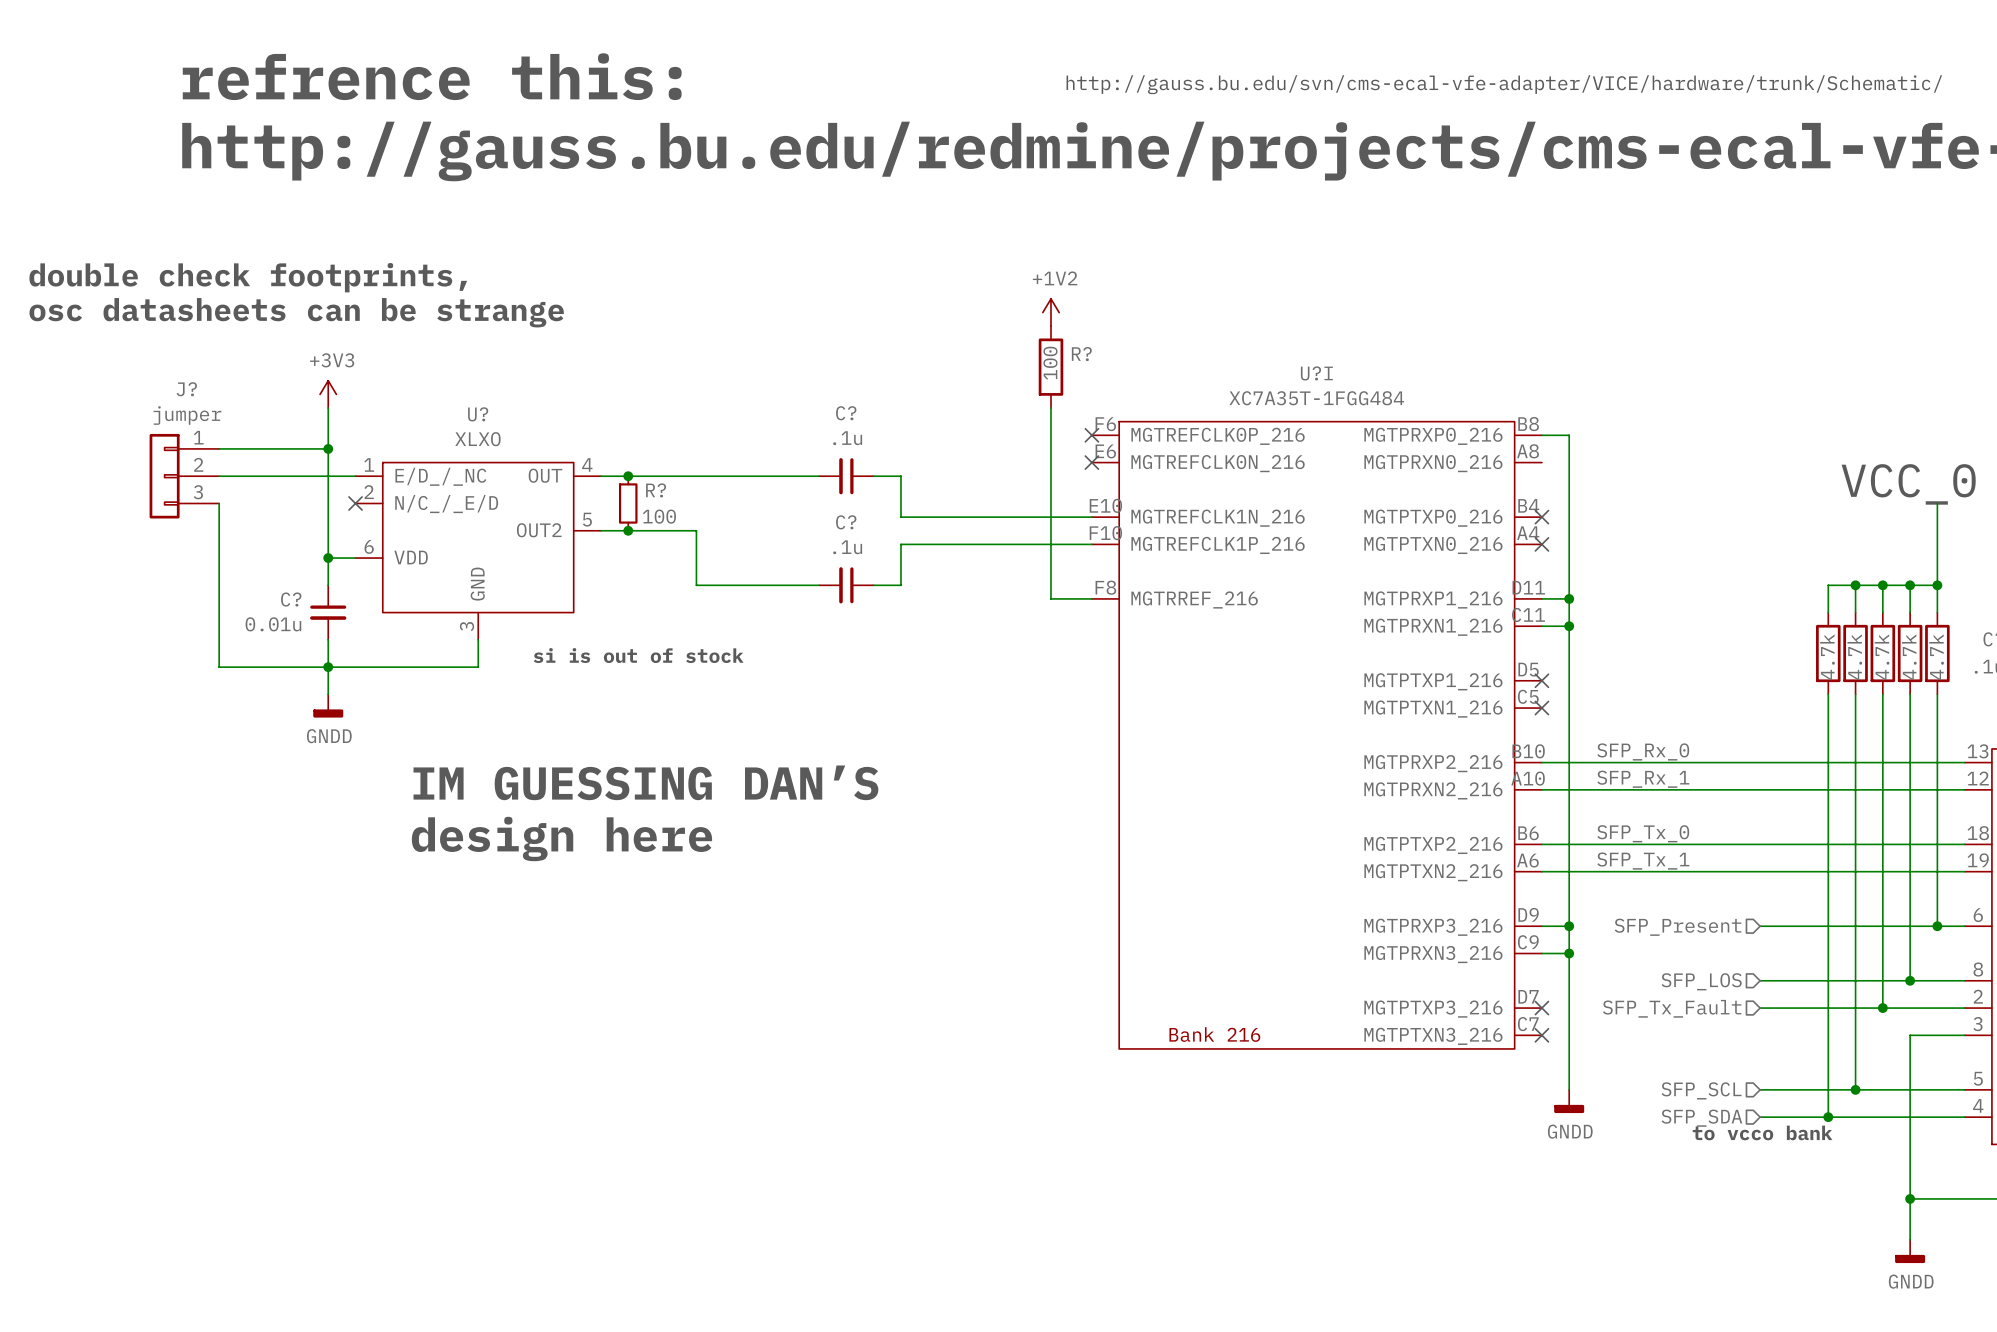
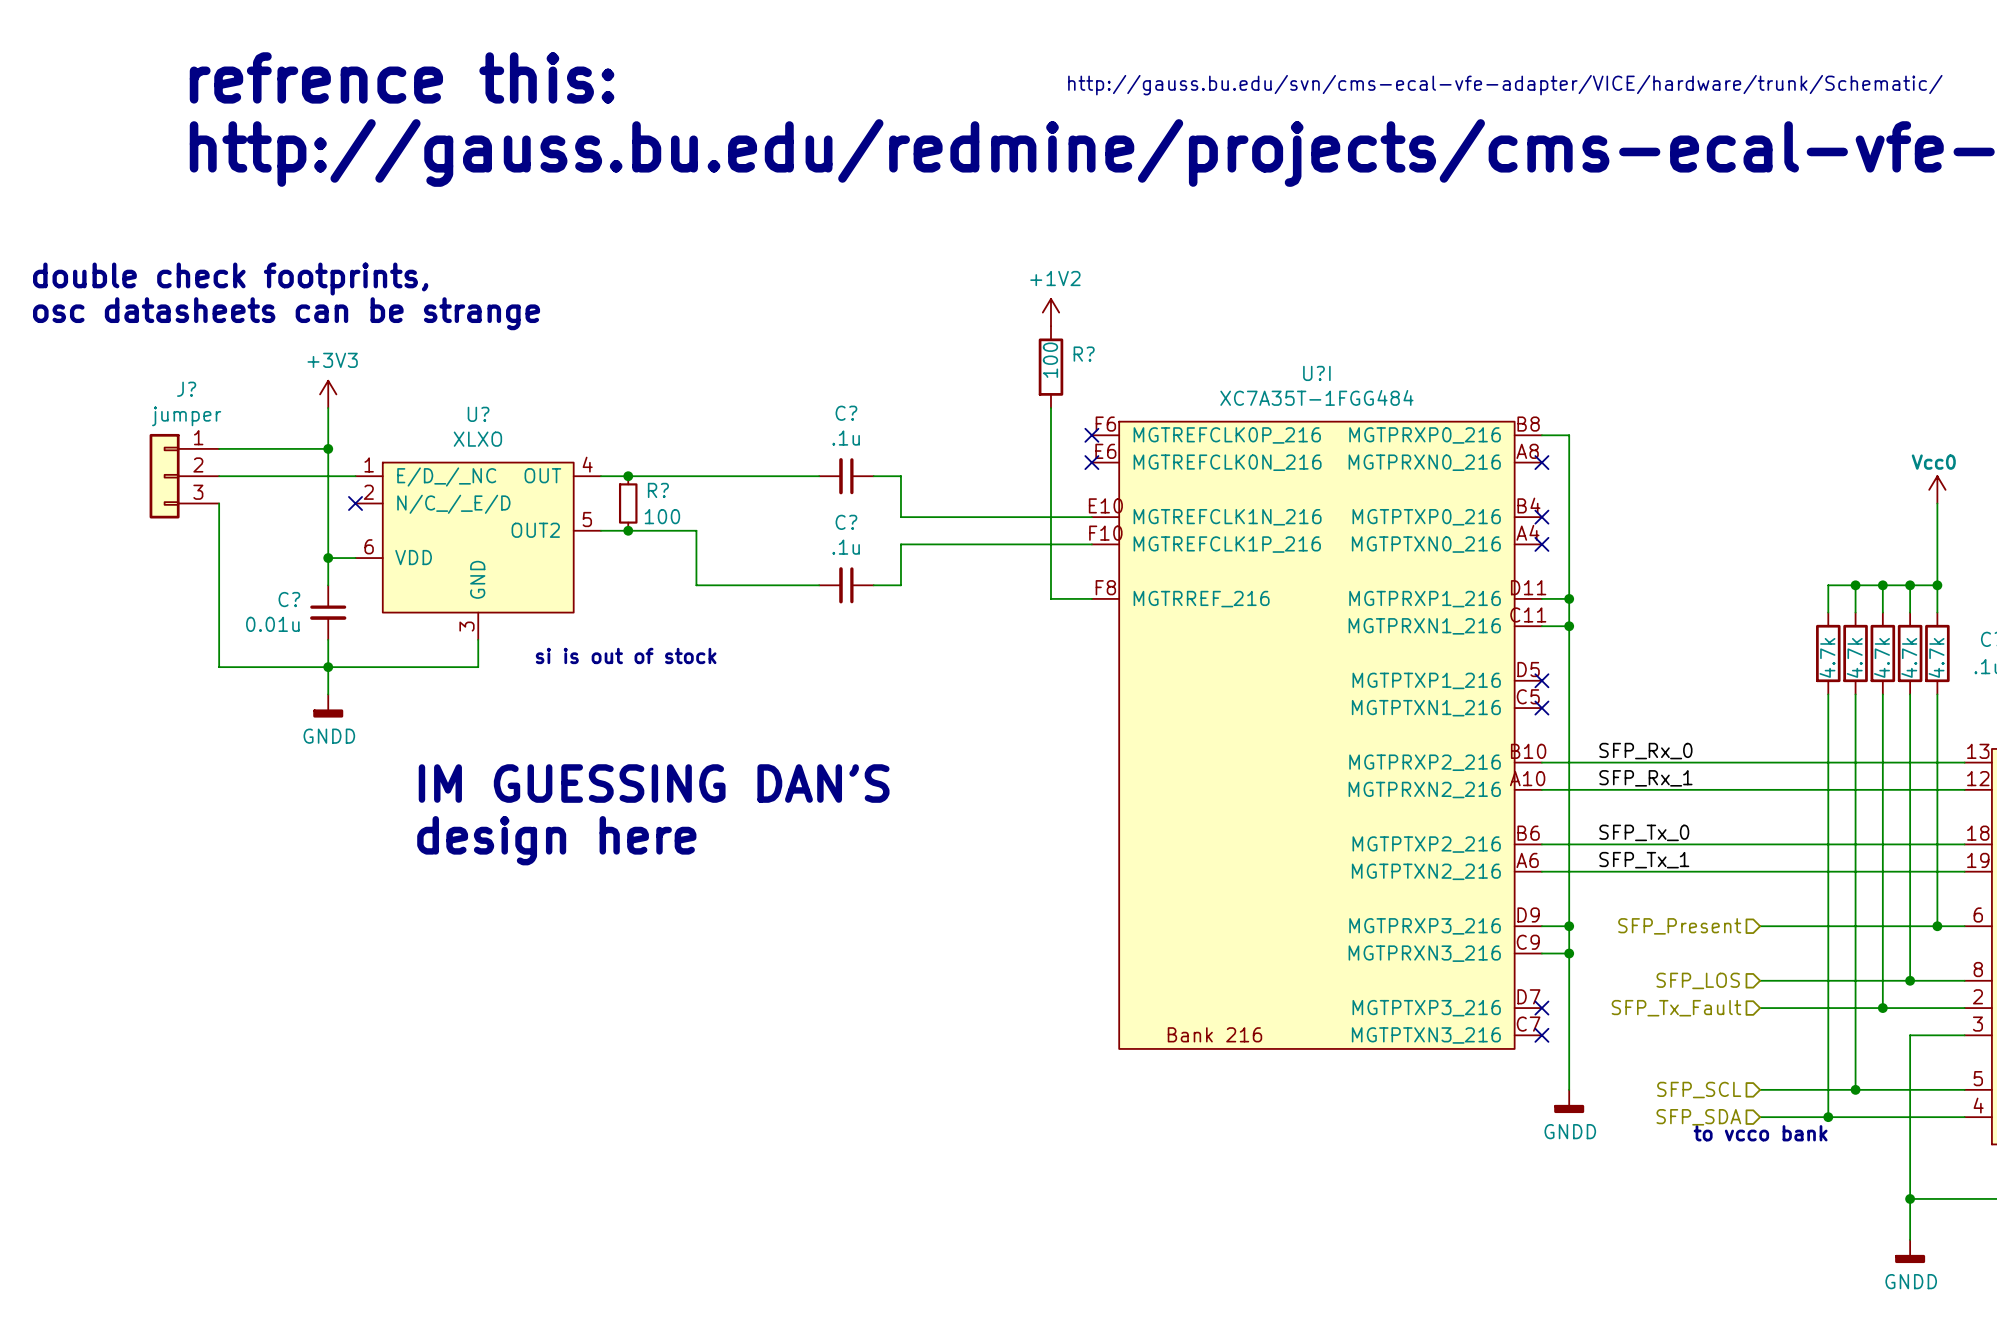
no-connect mark: none -> (1541, 462)
text: VCC_0 (1908, 484) -> none
part: none -> Vcc0 (1937, 489)

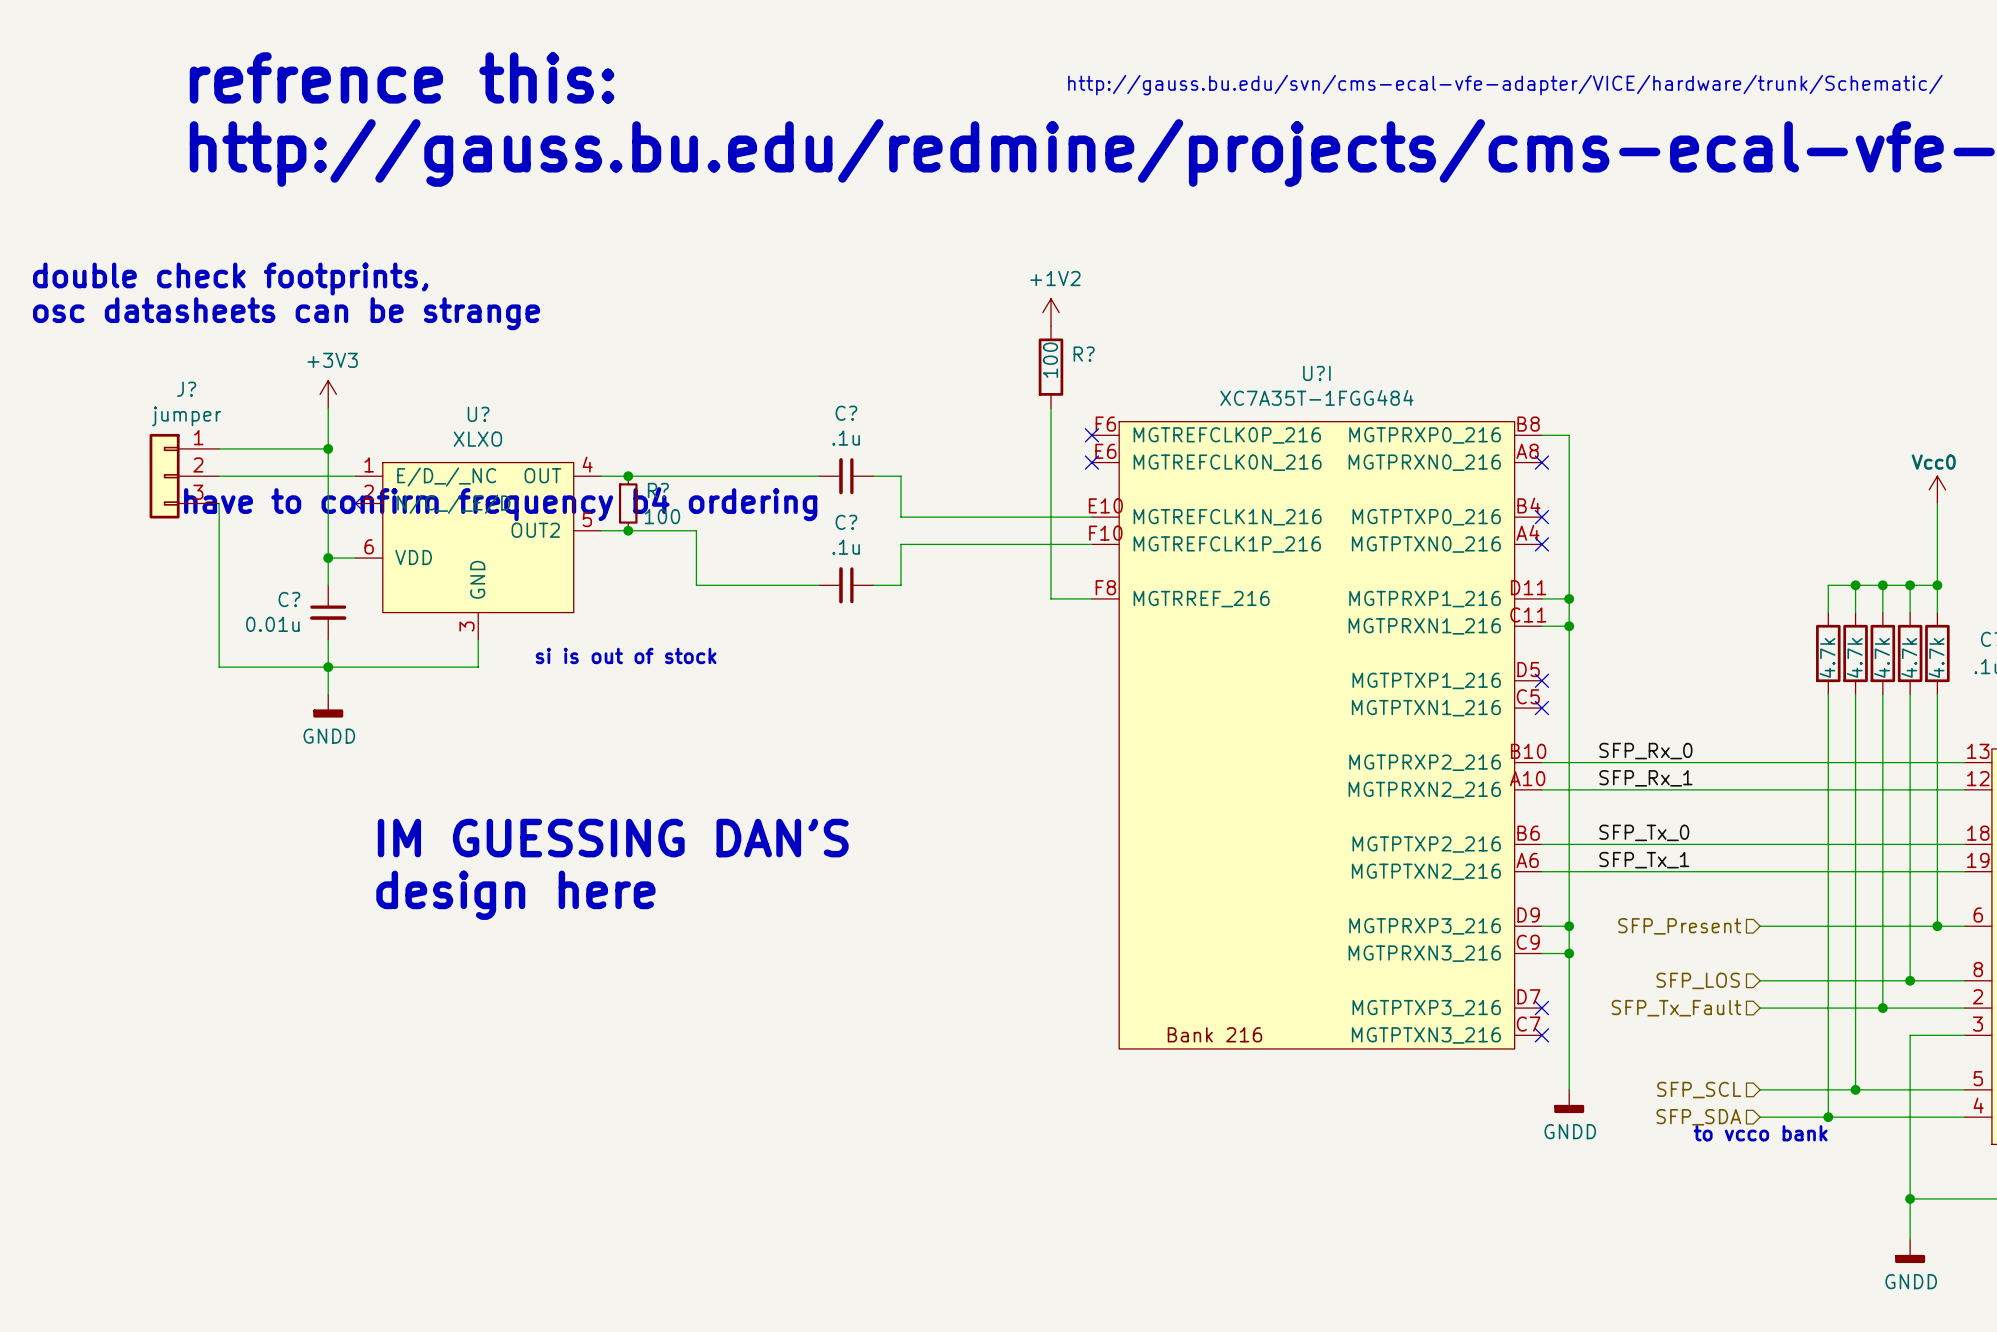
text: none -> have to confirm frequency b4 ordering (500, 504)
text position: IM GUESSING DAN’S (654, 783) -> IM GUESSING DAN’S (613, 838)
text position: design here (556, 840) -> design here (515, 895)

